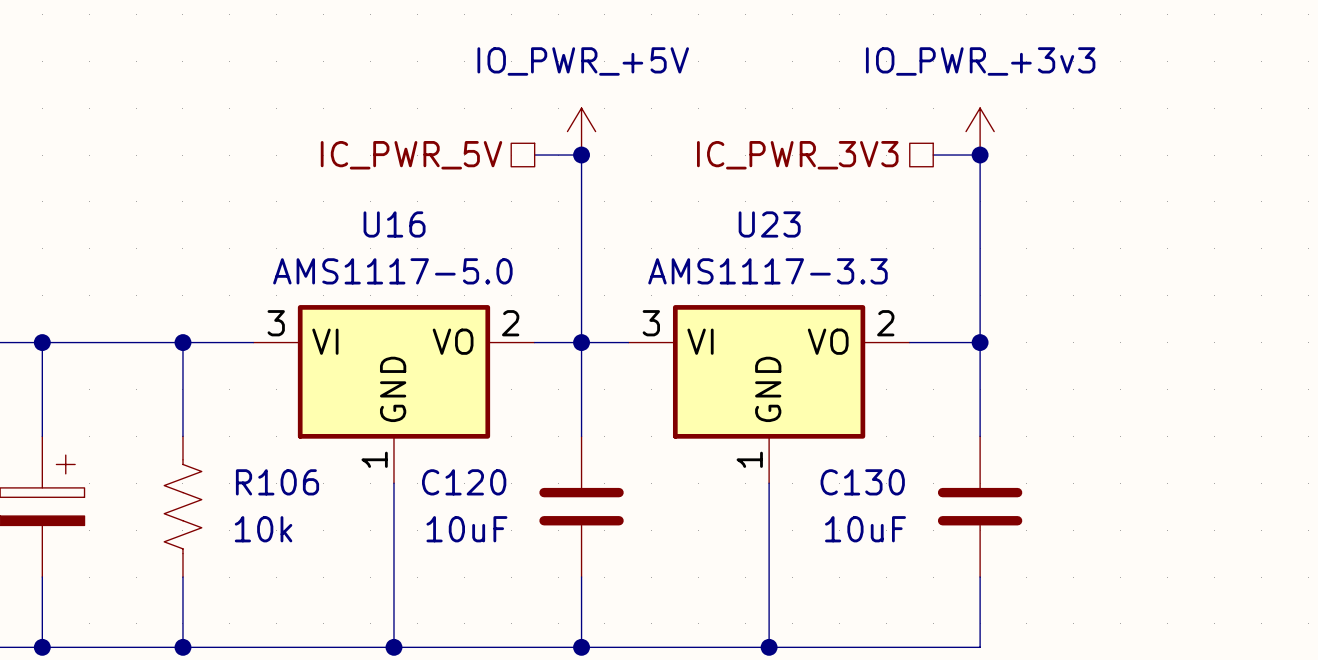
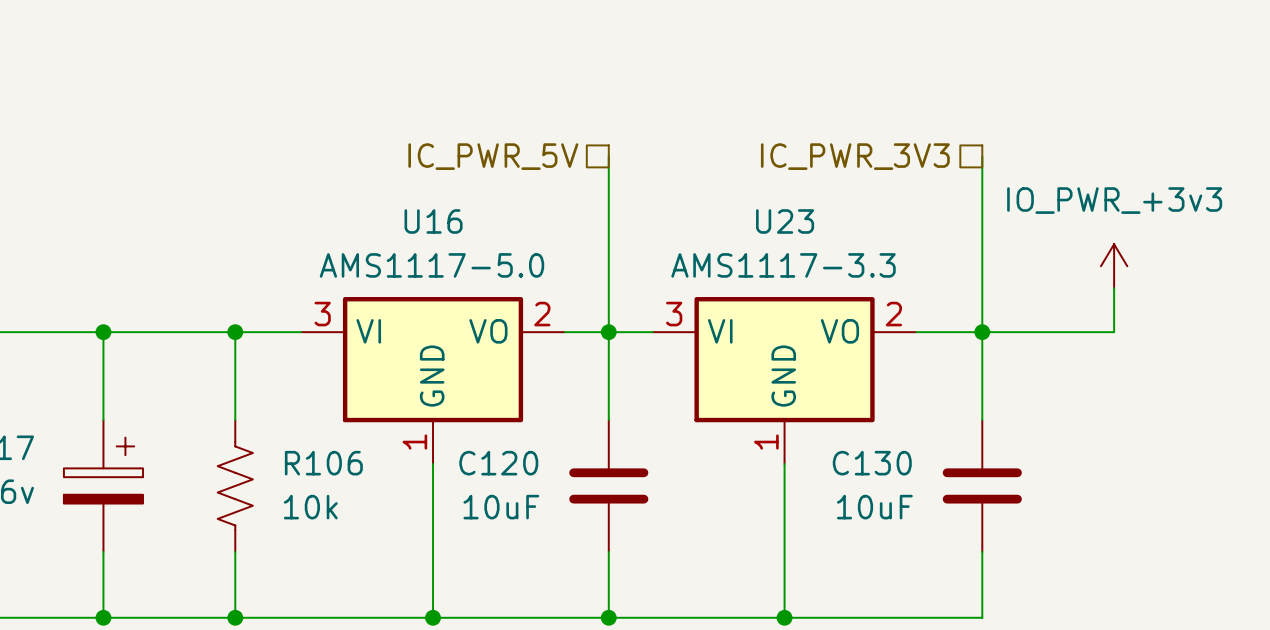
power symbol: IO_PWR_+5V (581, 131) -> none
power symbol position: IO_PWR_+3v3 (980, 131) -> IO_PWR_+3v3 (1114, 266)
hierarchical label position: IC_PWR_5V (411, 155) -> IC_PWR_5V (493, 156)
wire: (534, 155) (581, 155) -> none
junction: (581, 155) -> none
hierarchical label position: IC_PWR_3V3 (797, 155) -> IC_PWR_3V3 (855, 156)
wire: (933, 155) (980, 155) -> none
junction: (980, 155) -> none
wire: none -> (1114, 288) (1114, 332) (982, 332)

